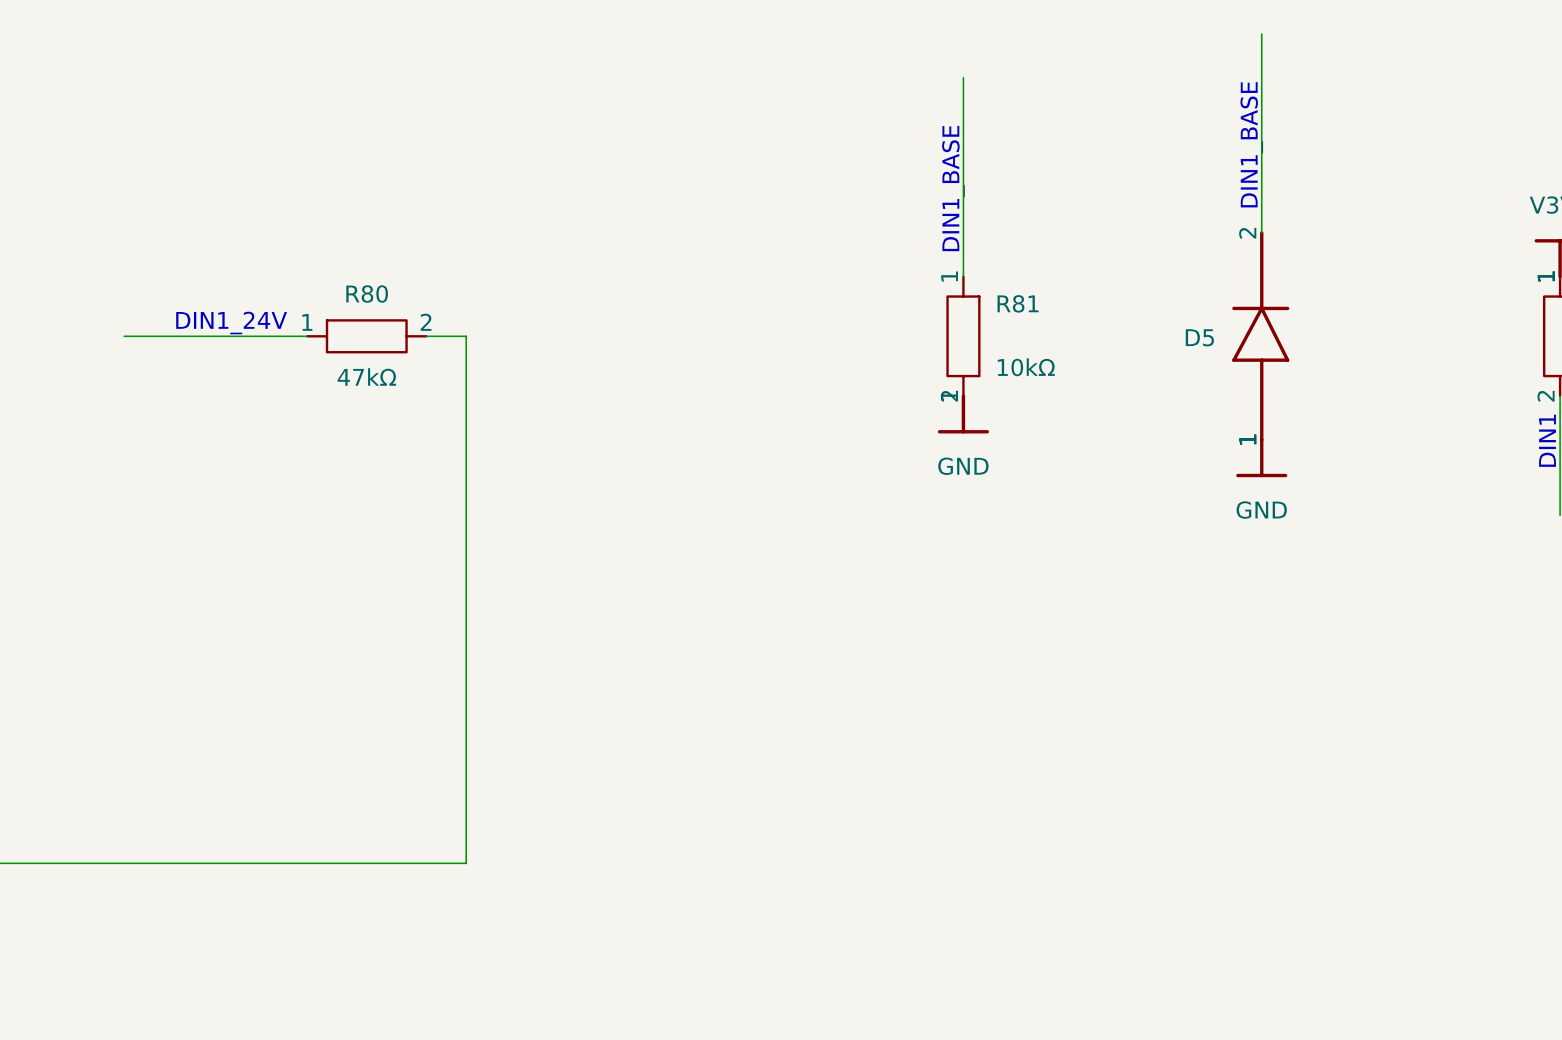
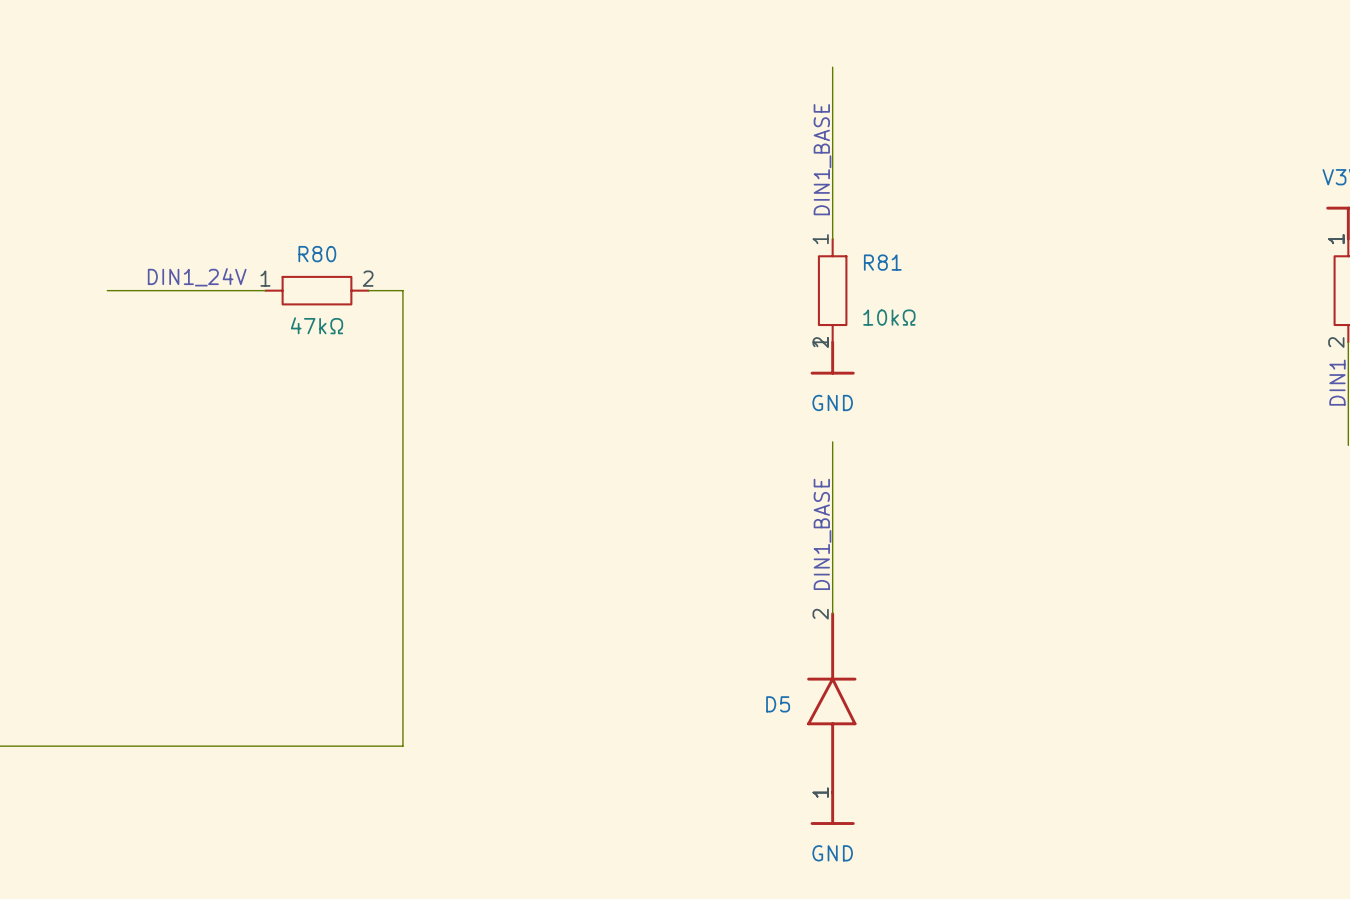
wire: (1261, 33) (1261, 232) -> none
text: DIN1_BASE (1251, 144) -> none
D5 position: (1260, 336) -> (831, 703)
GND: (1261, 457) -> none
wire: none -> (832, 441) (832, 613)
text: none -> DIN1_BASE (822, 534)
GND: none -> (832, 808)

